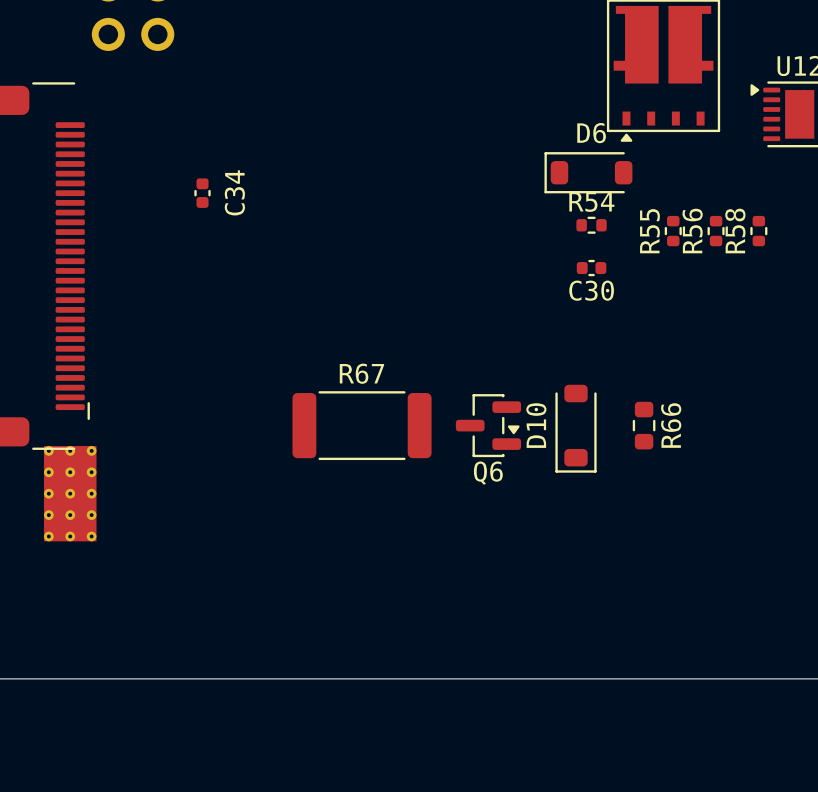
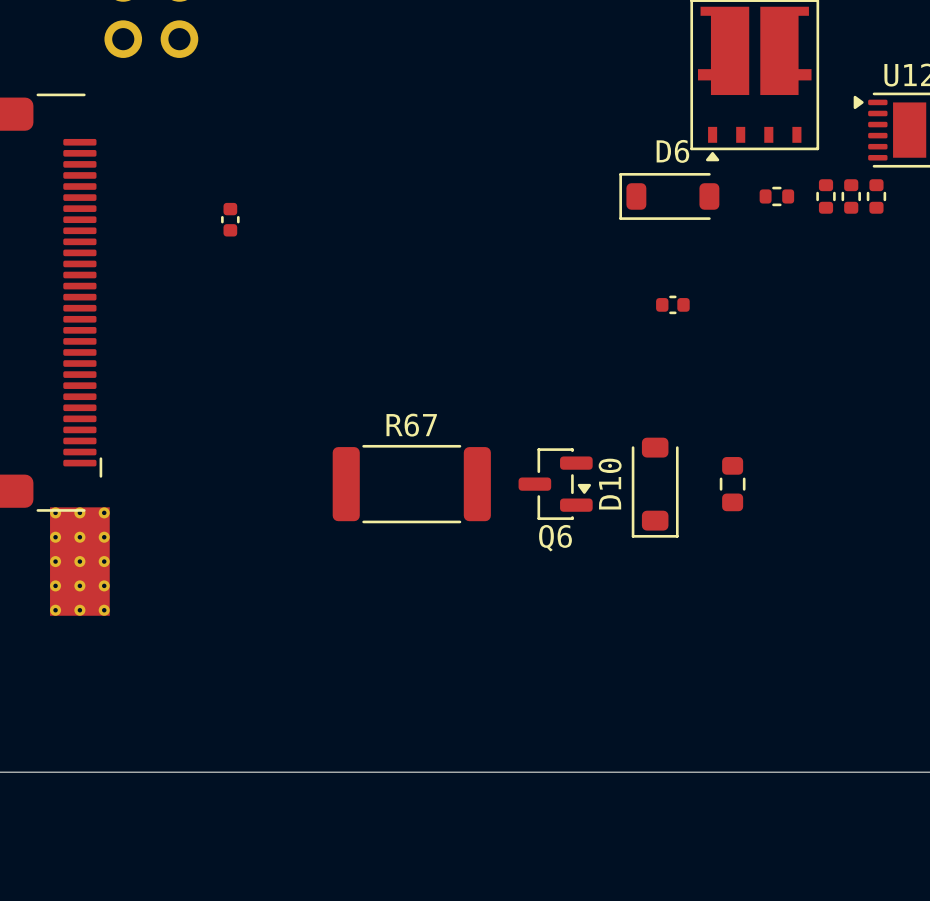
part: none -> (776, 196)
part: none -> (826, 196)
part: none -> (851, 196)
part: none -> (876, 196)
C34 name: C34 (234, 192) -> none
R54: (591, 225) -> none
R55: (673, 231) -> none
R56: (716, 231) -> none
R58: (758, 231) -> none
C30 name: C30 (591, 290) -> none
R66 name: R66 (671, 425) -> none

